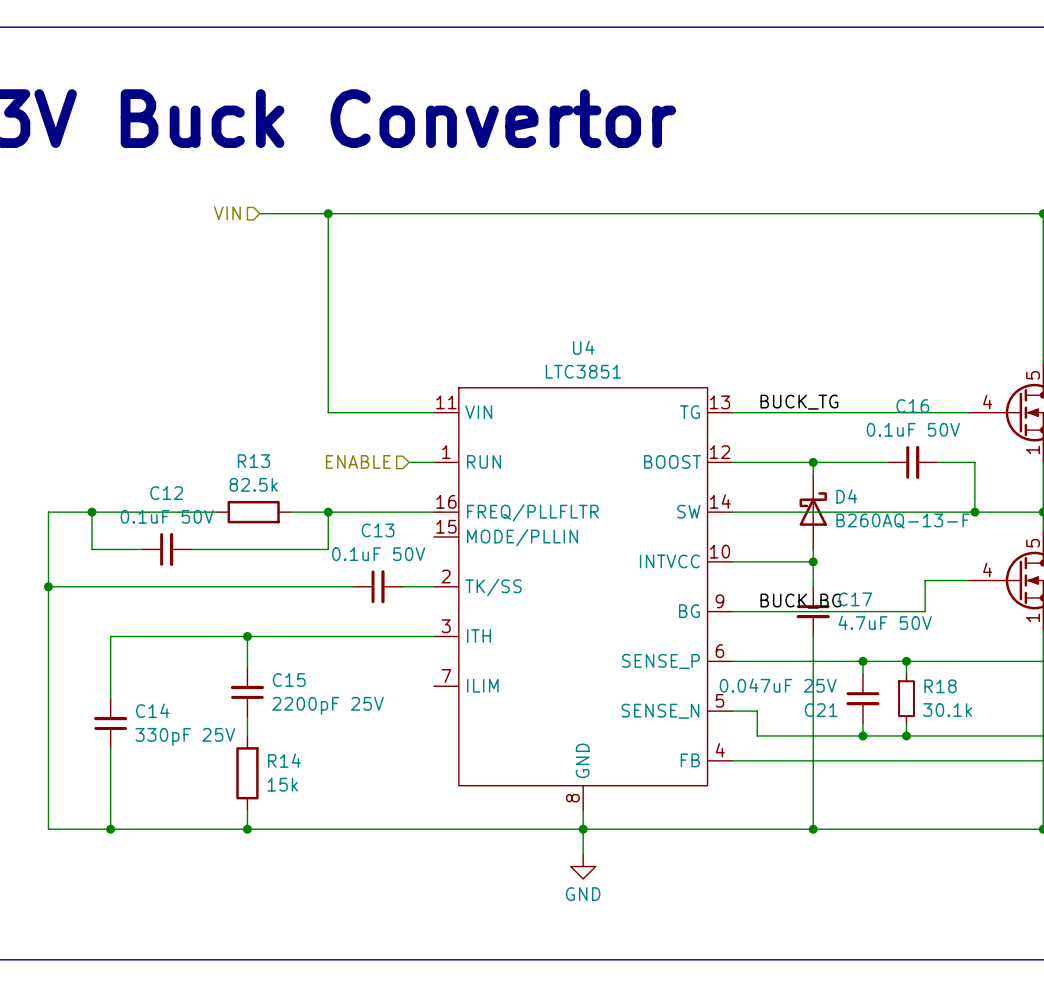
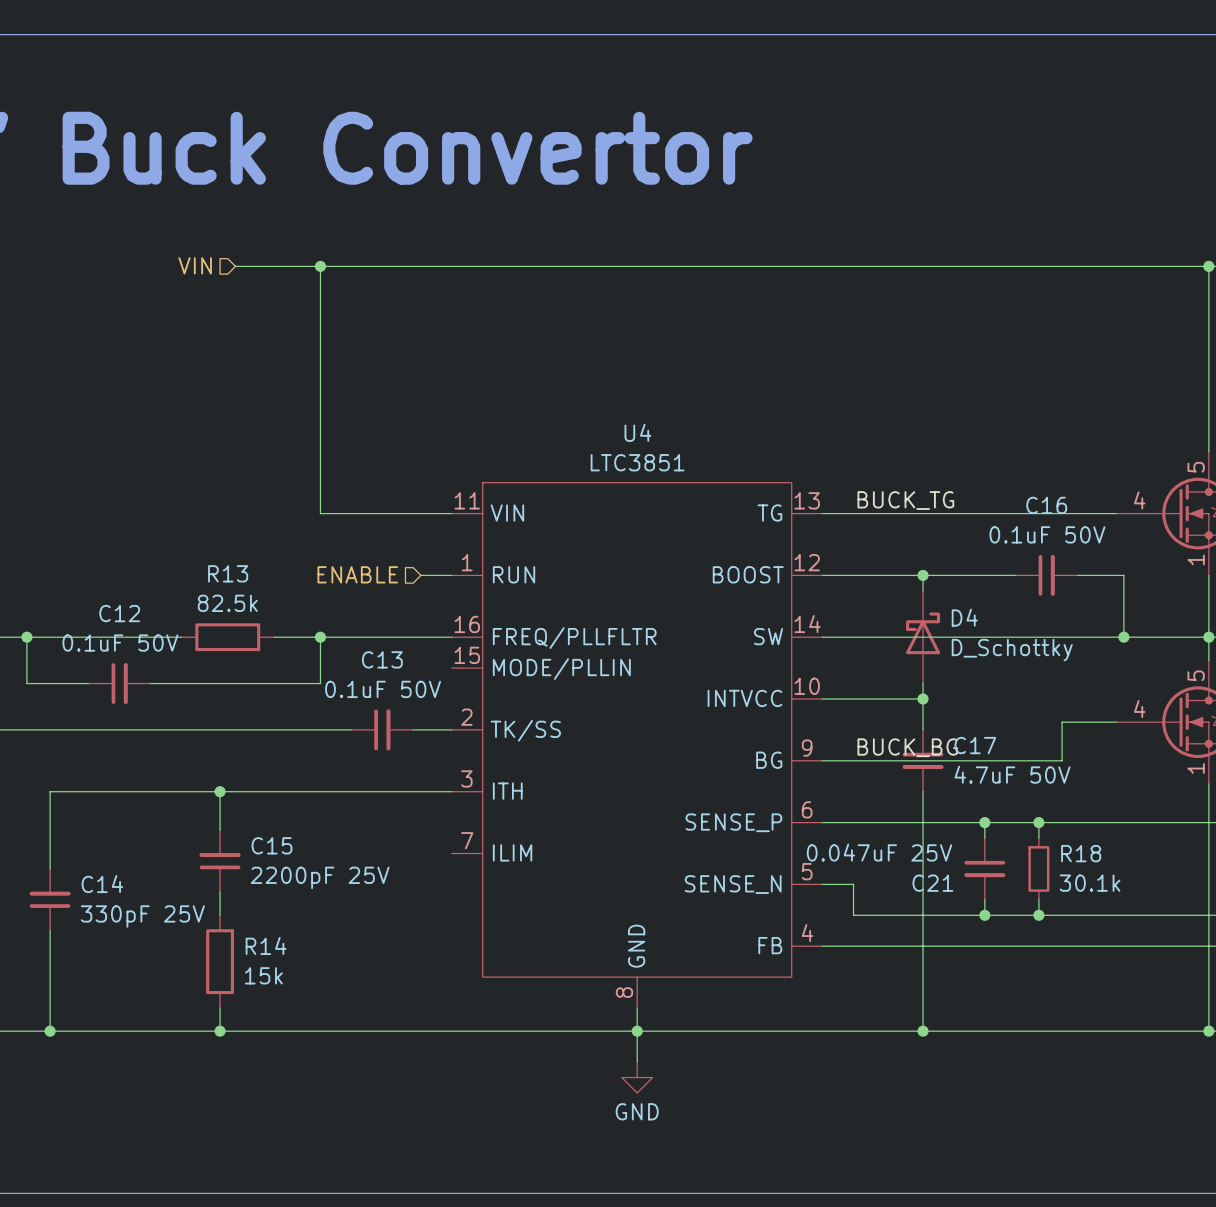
D4 value: B260AQ-13-F (903, 521) -> D_Schottky (1012, 650)

